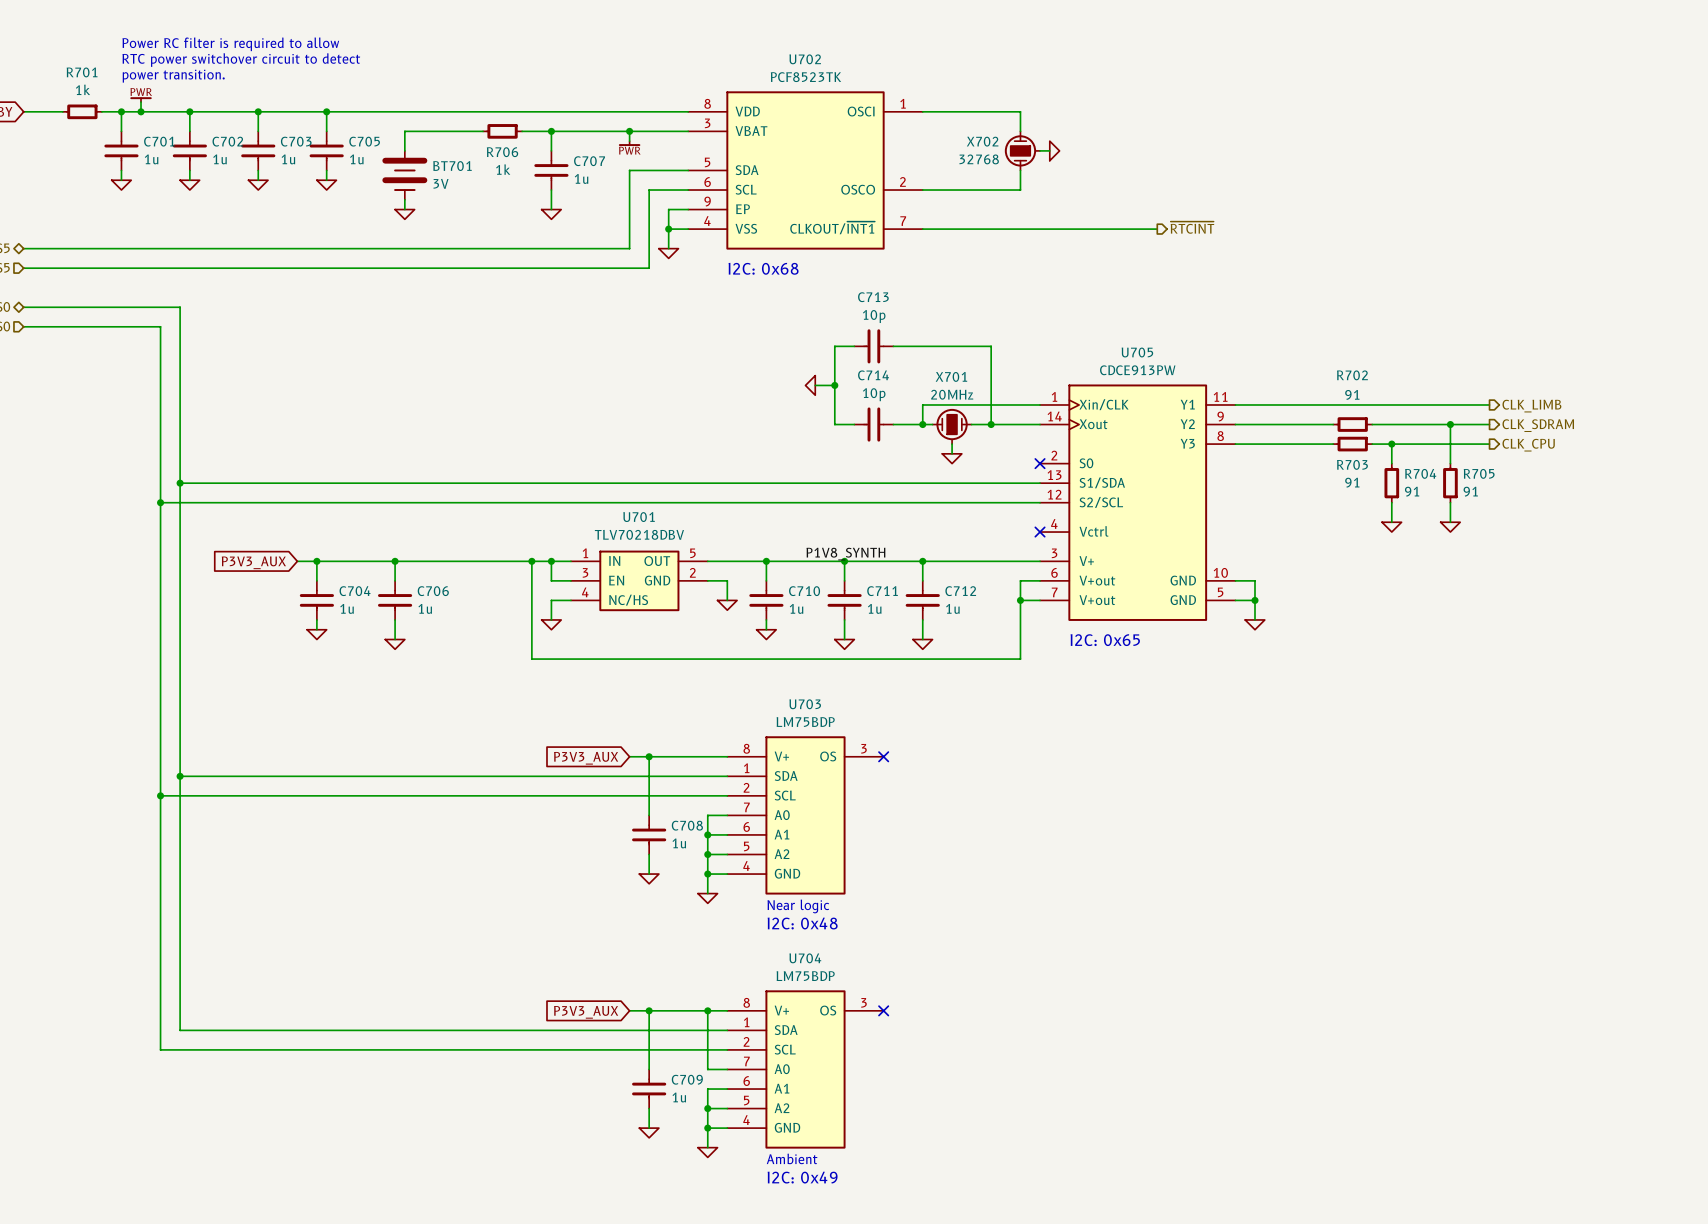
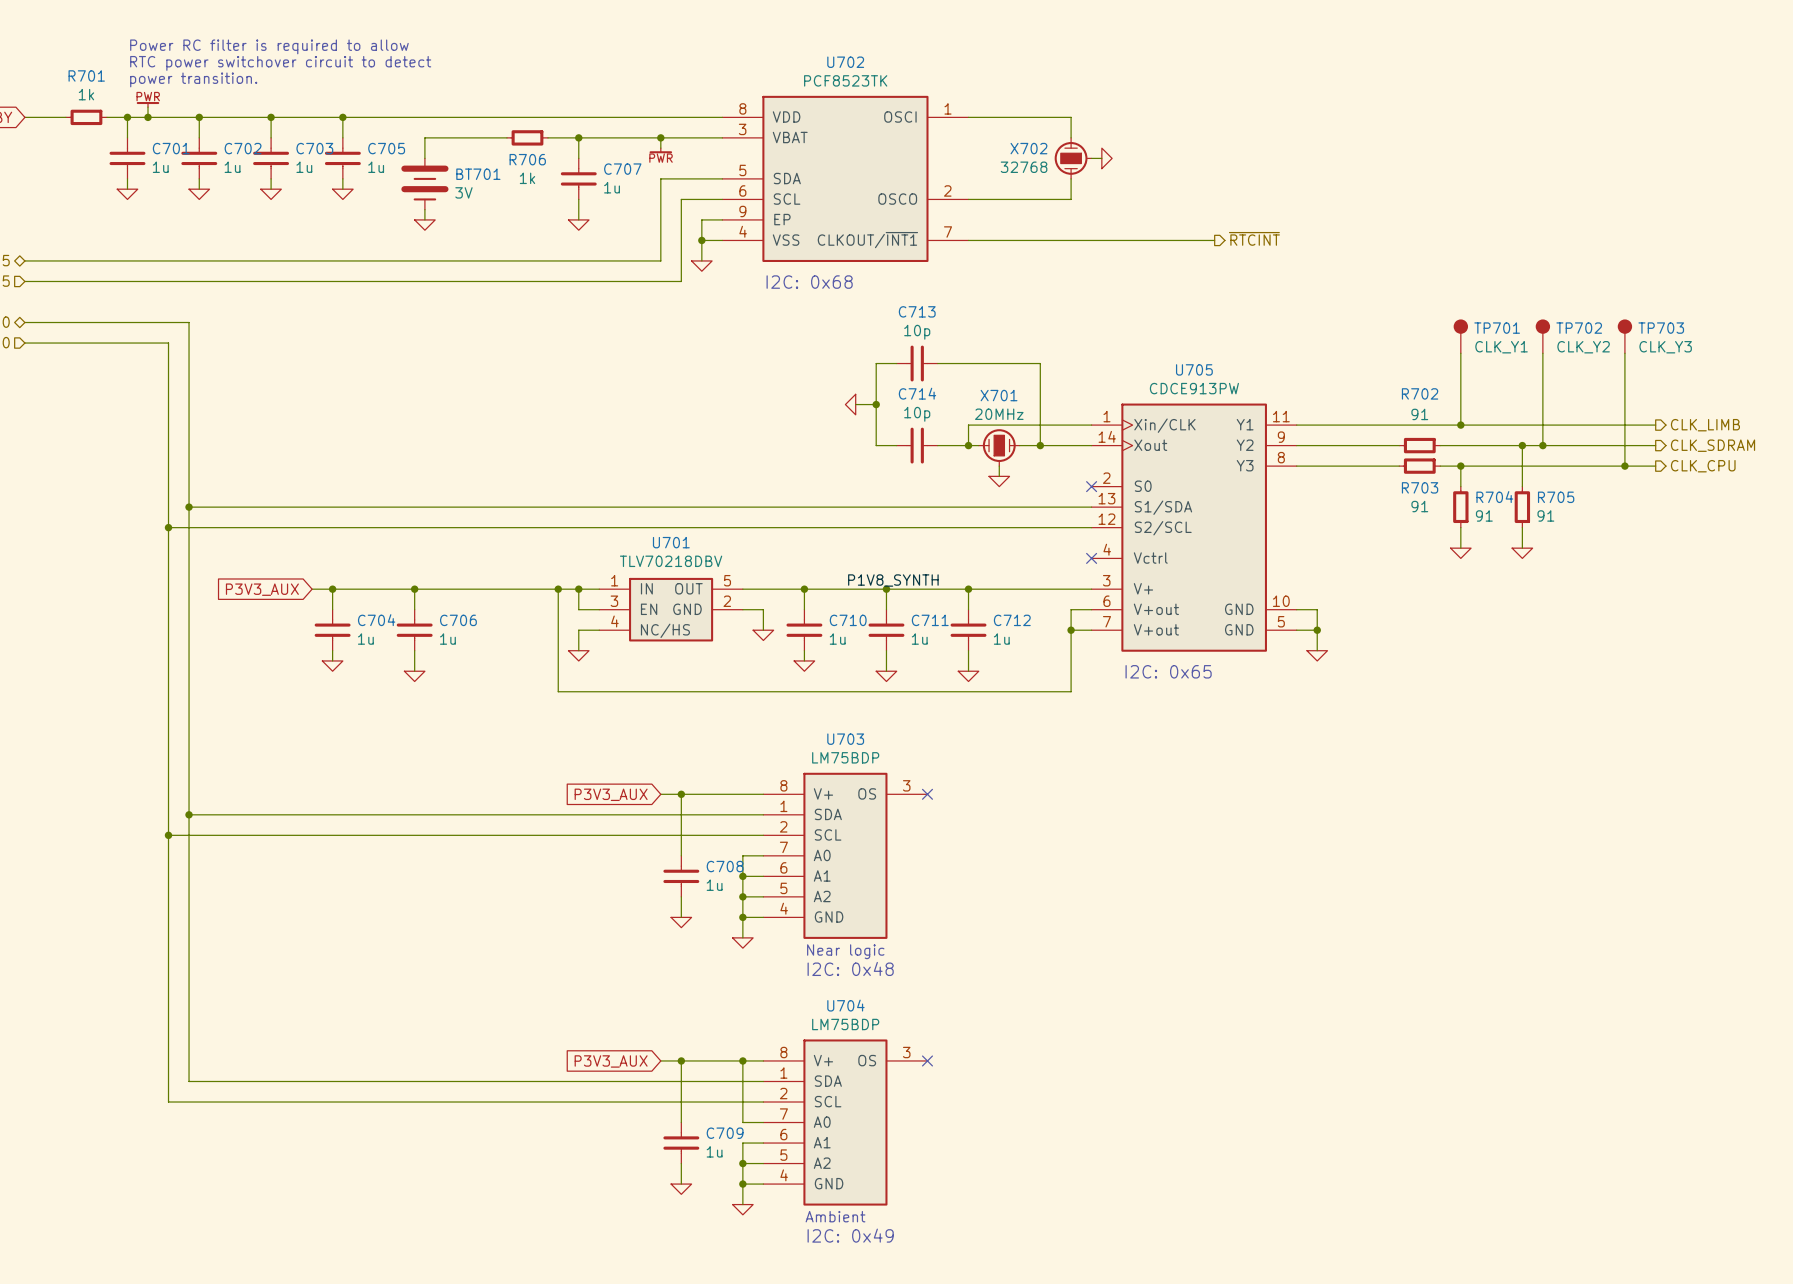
TP701: none -> CLK_Y1 (1460, 336)
TP702: none -> CLK_Y2 (1542, 336)
TP703: none -> CLK_Y3 (1624, 336)
wire: none -> (1460, 353) (1460, 425)
wire: none -> (1542, 353) (1542, 445)
wire: none -> (1624, 353) (1624, 466)
junction: none -> (1460, 425)
wire: none -> (1563, 425) (1655, 425)
hierarchical label position: CLK_LIMB (1531, 406) -> CLK_LIMB (1705, 425)
junction: none -> (1542, 445)
wire: none -> (1563, 445) (1655, 445)
hierarchical label position: CLK_SDRAM (1538, 425) -> CLK_SDRAM (1713, 445)
wire: none -> (1563, 466) (1655, 466)
junction: none -> (1624, 466)
hierarchical label position: CLK_CPU (1528, 445) -> CLK_CPU (1703, 466)

